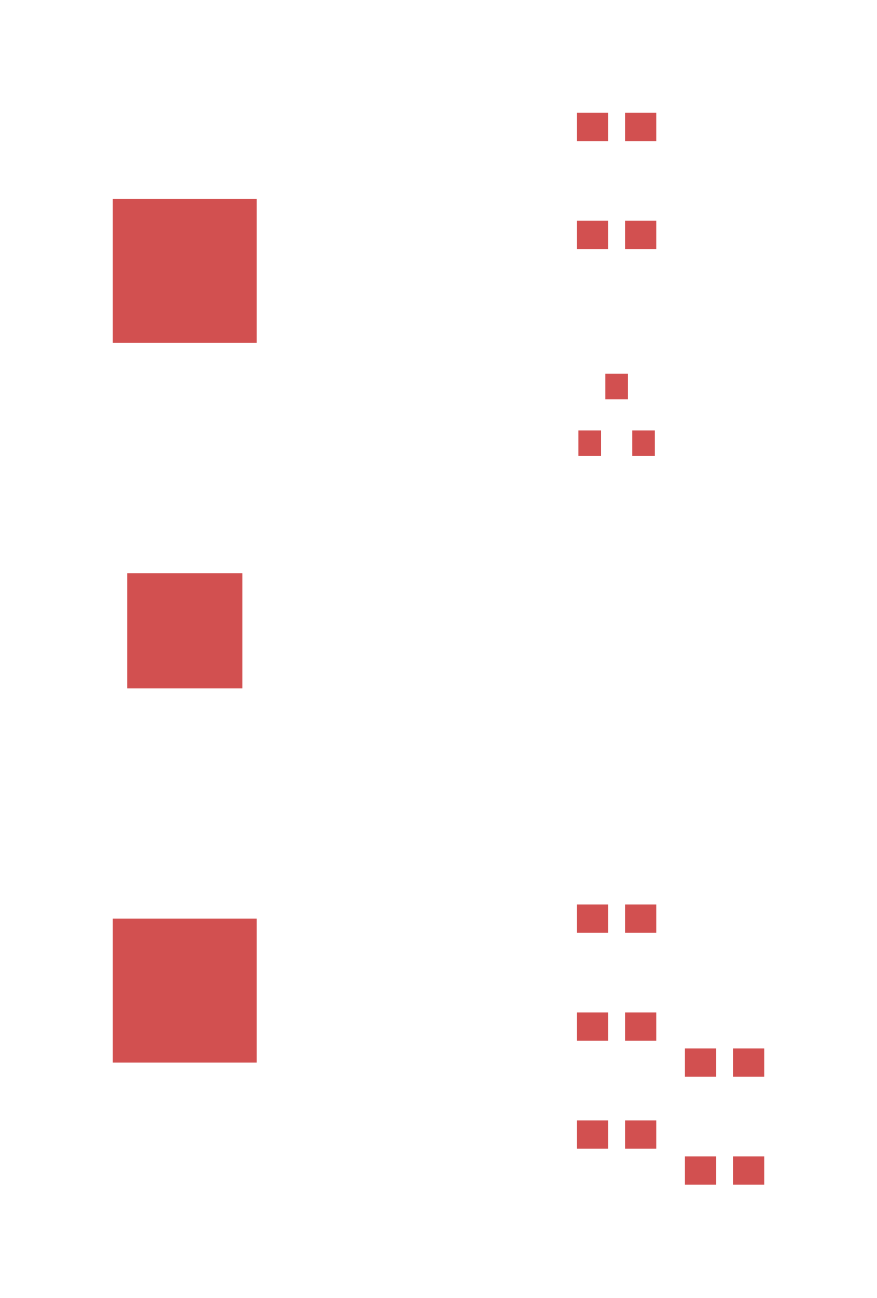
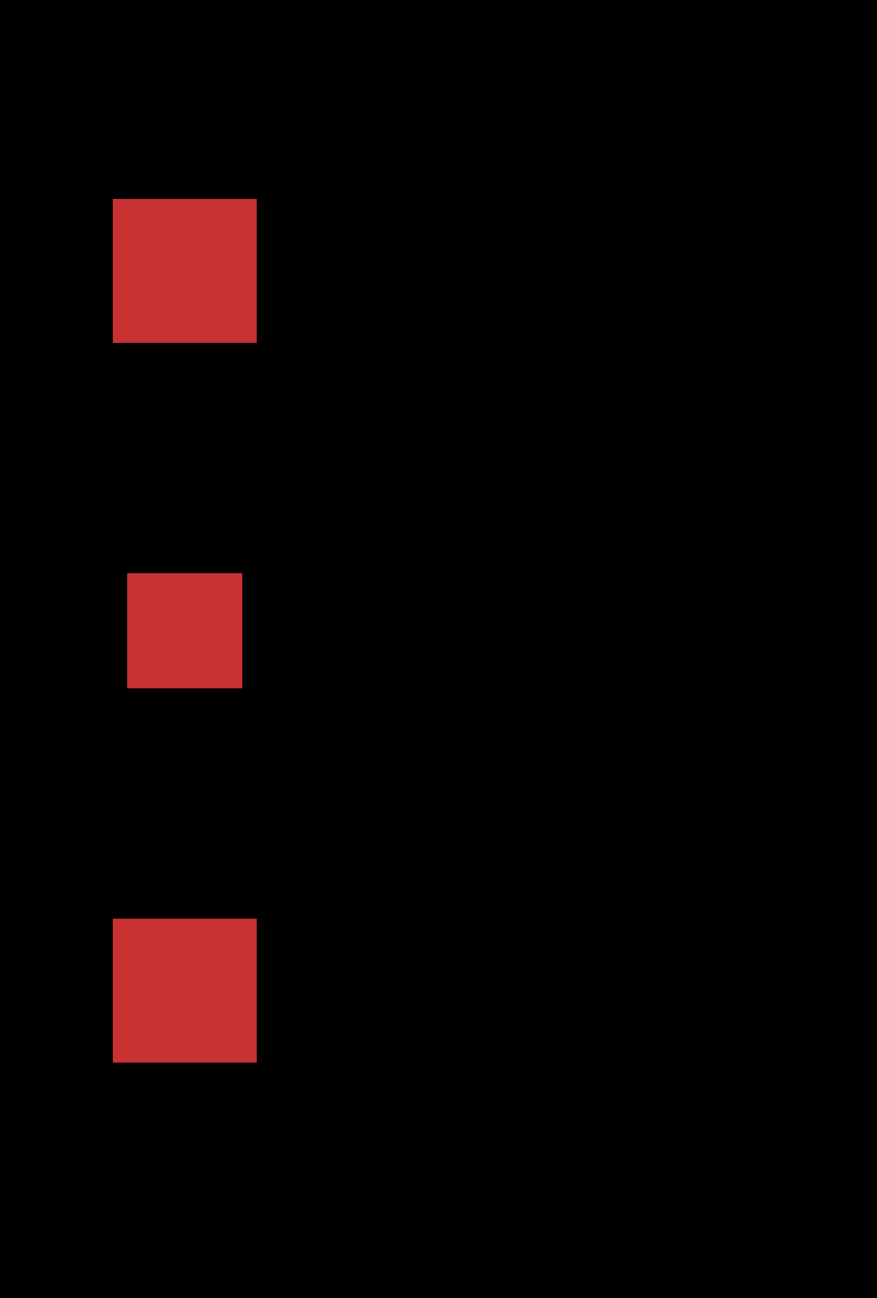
part: (616, 126) -> none
part: (616, 234) -> none
part: (616, 414) -> none
part: (616, 918) -> none
part: (616, 1026) -> none
part: (724, 1062) -> none
part: (616, 1134) -> none
part: (724, 1170) -> none

